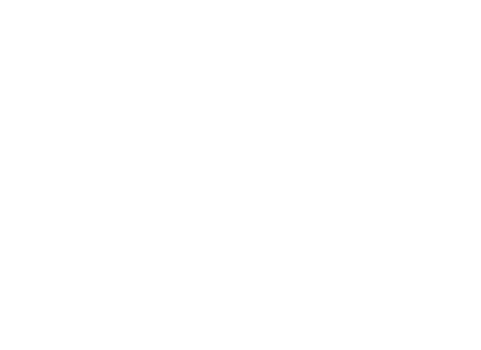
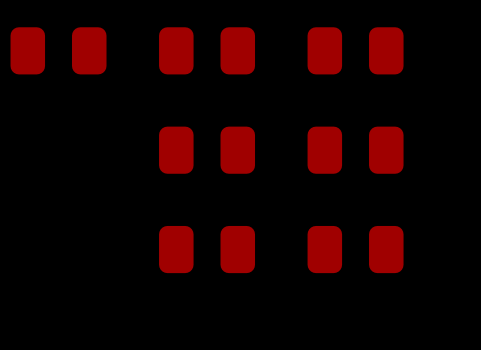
part: none -> (58, 50)
part: none -> (207, 50)
part: none -> (355, 50)
part: none -> (207, 150)
part: none -> (355, 150)
part: none -> (207, 249)
part: none -> (355, 249)

